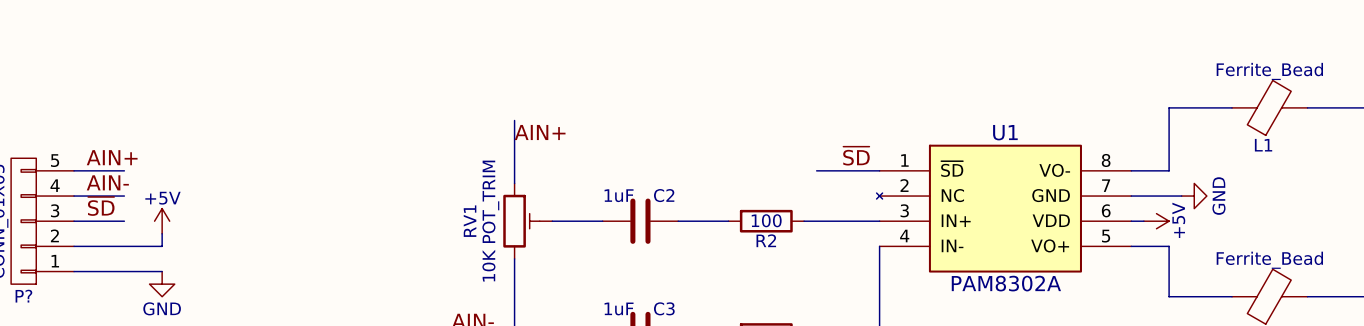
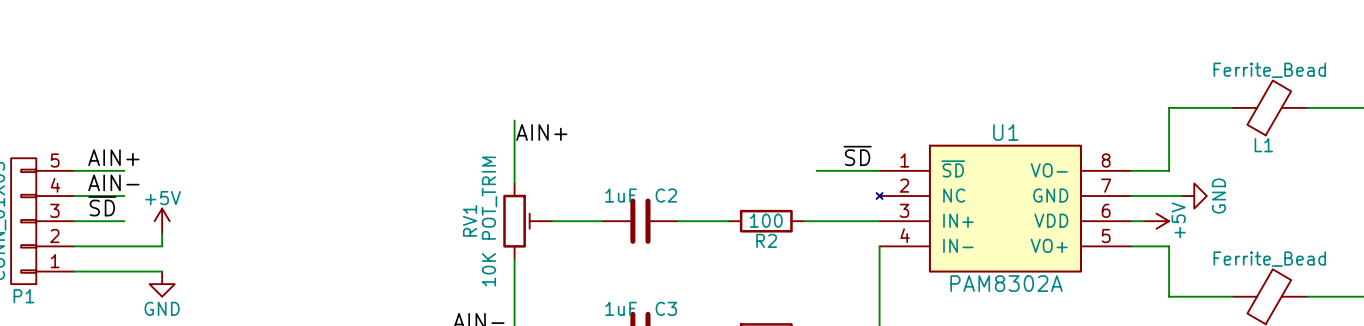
P? name: P? (23, 296) -> P1 (23, 296)

